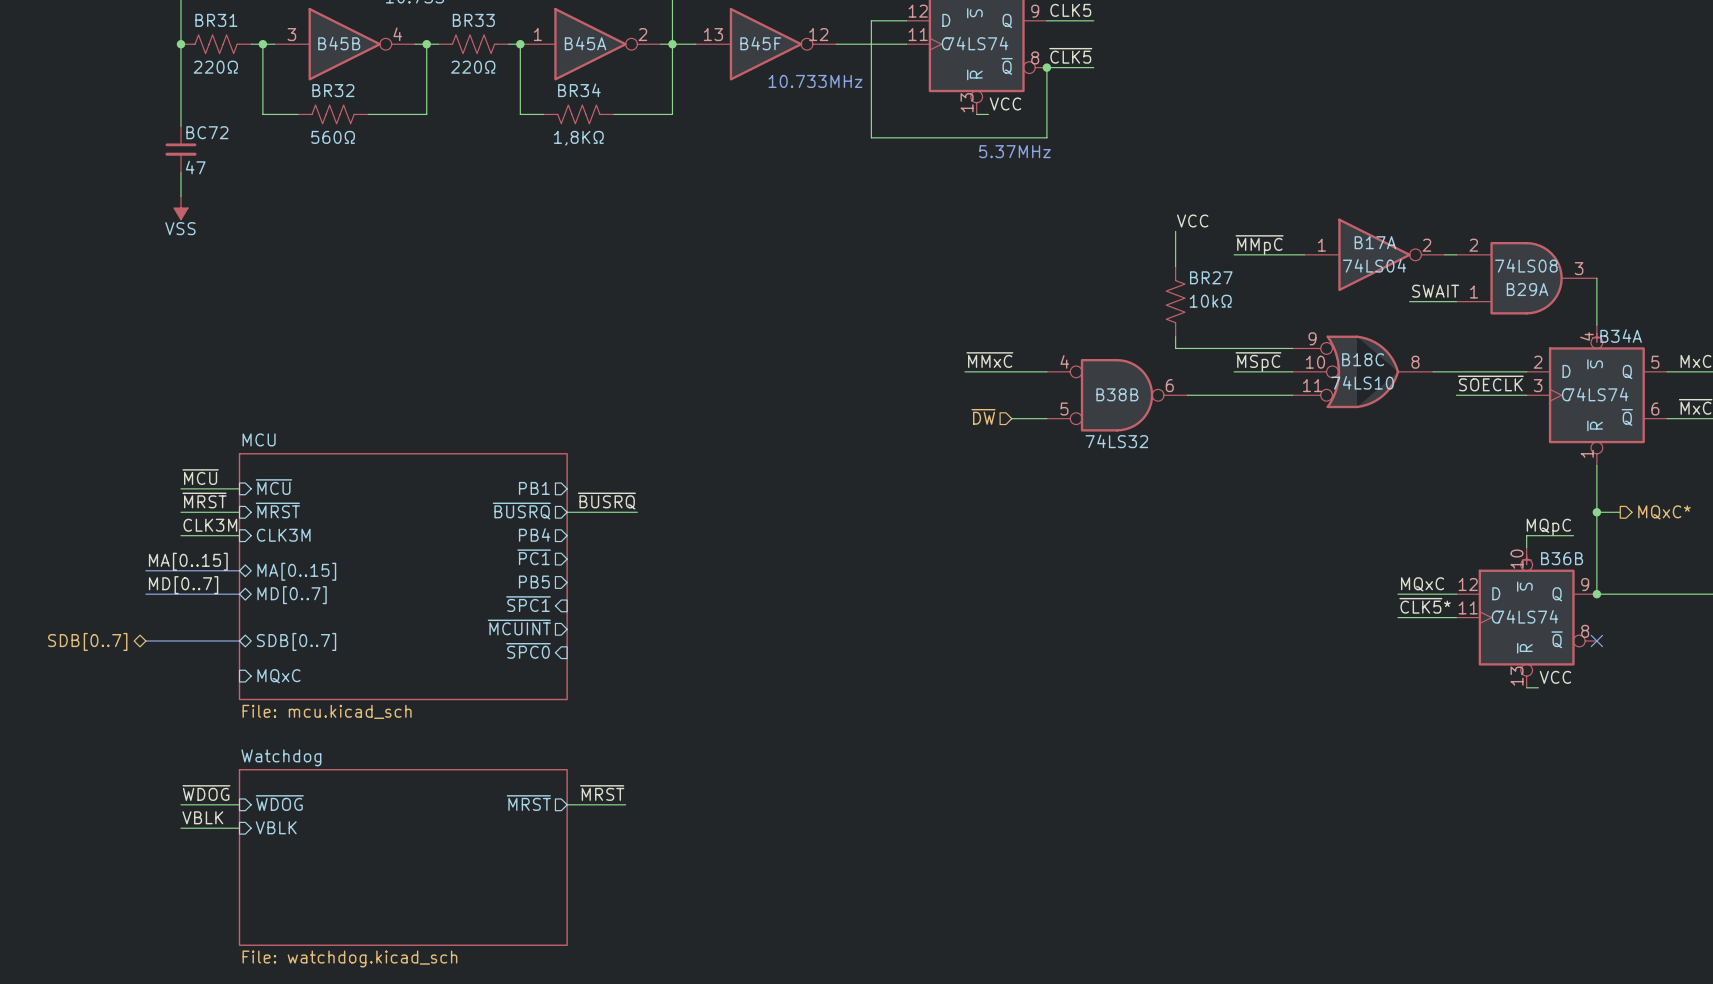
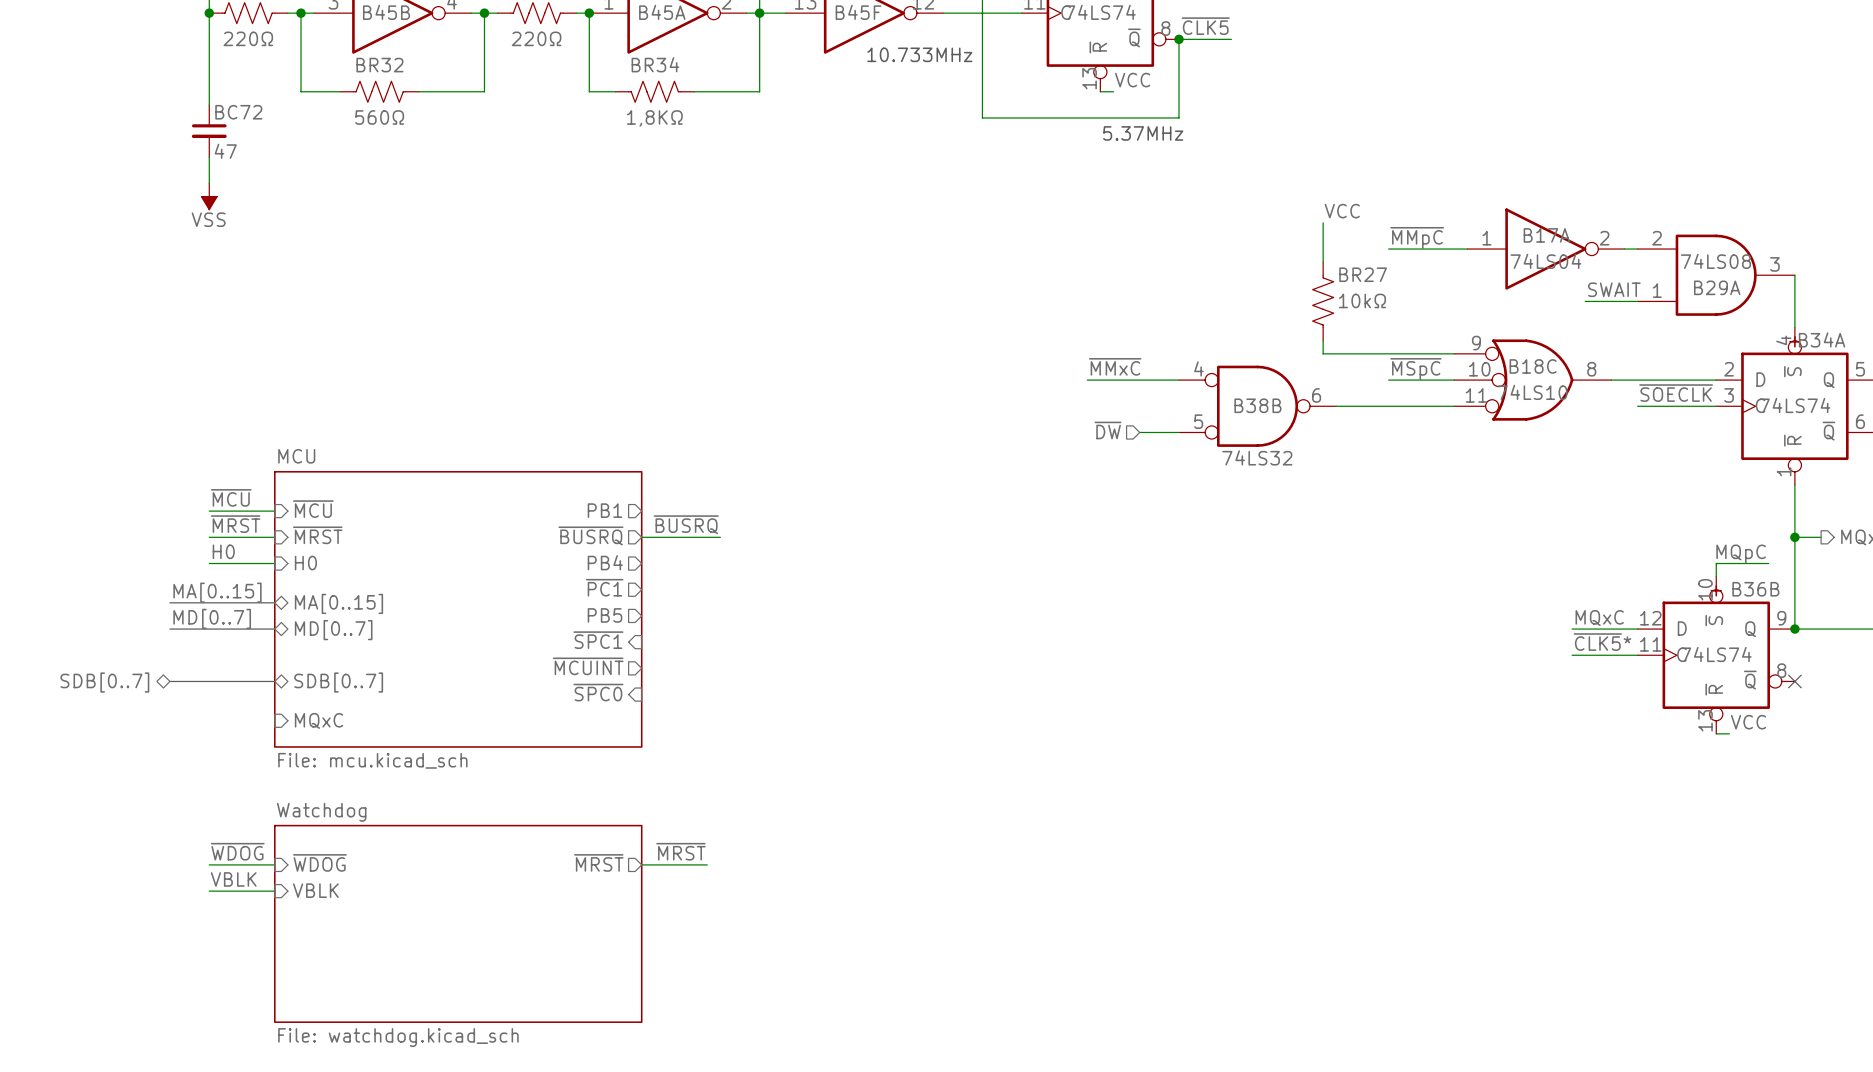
label: CLK3M (210, 525) -> H0 (223, 551)
sheet pin: CLK3M (283, 535) -> H0 (305, 563)

